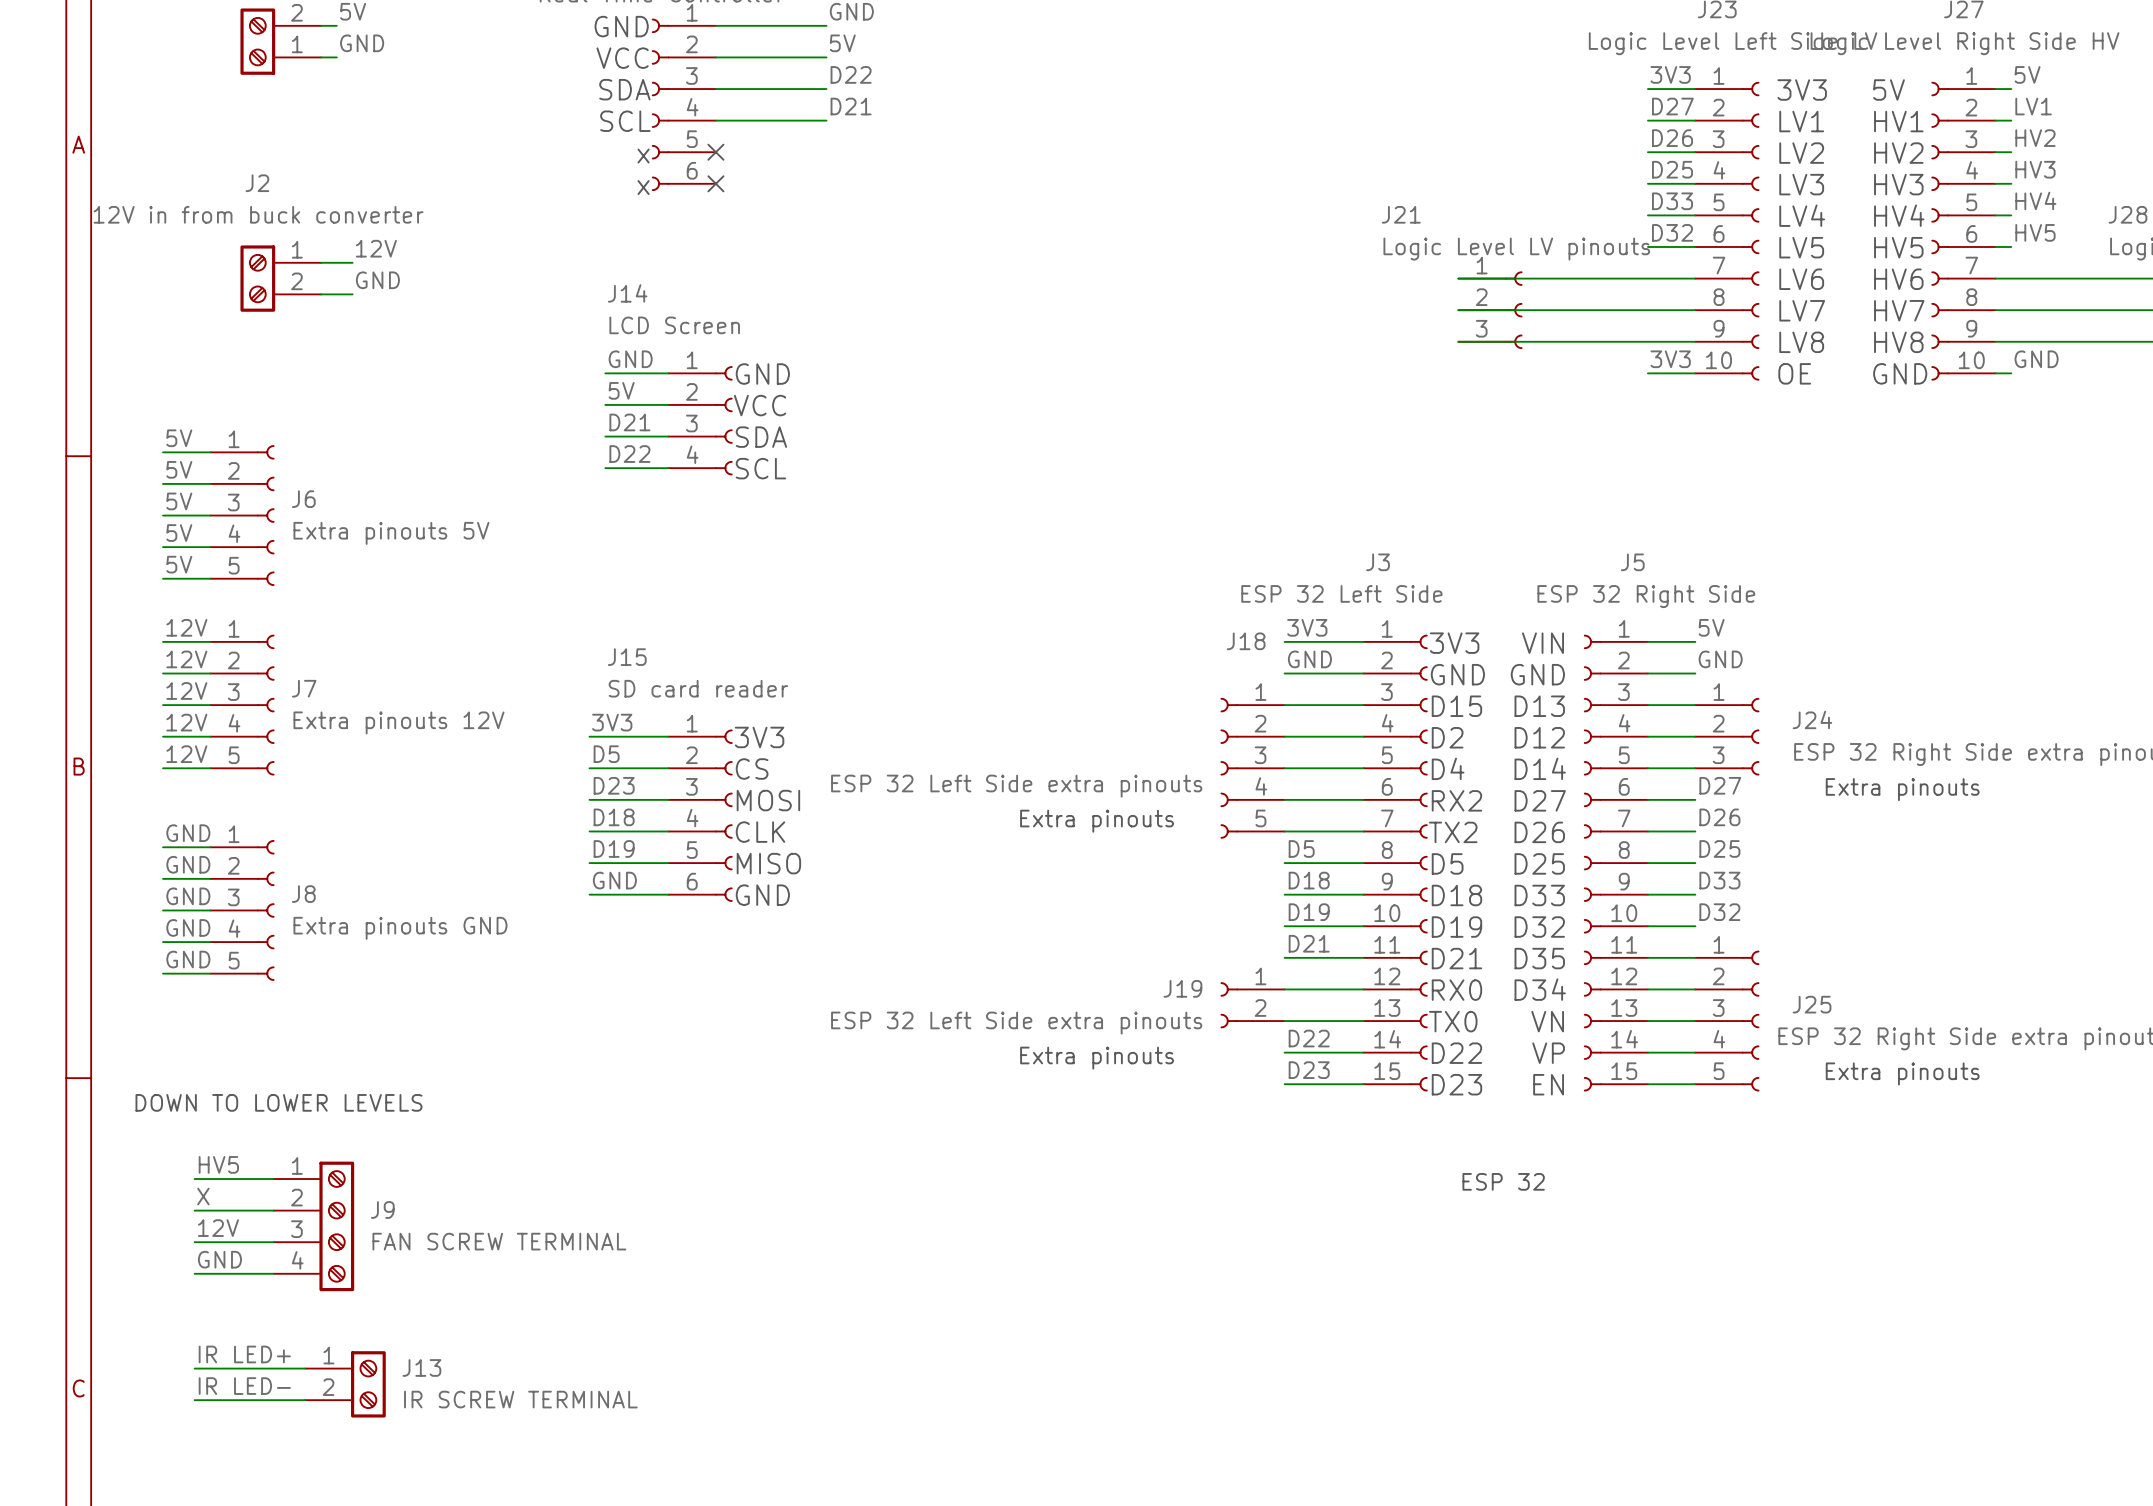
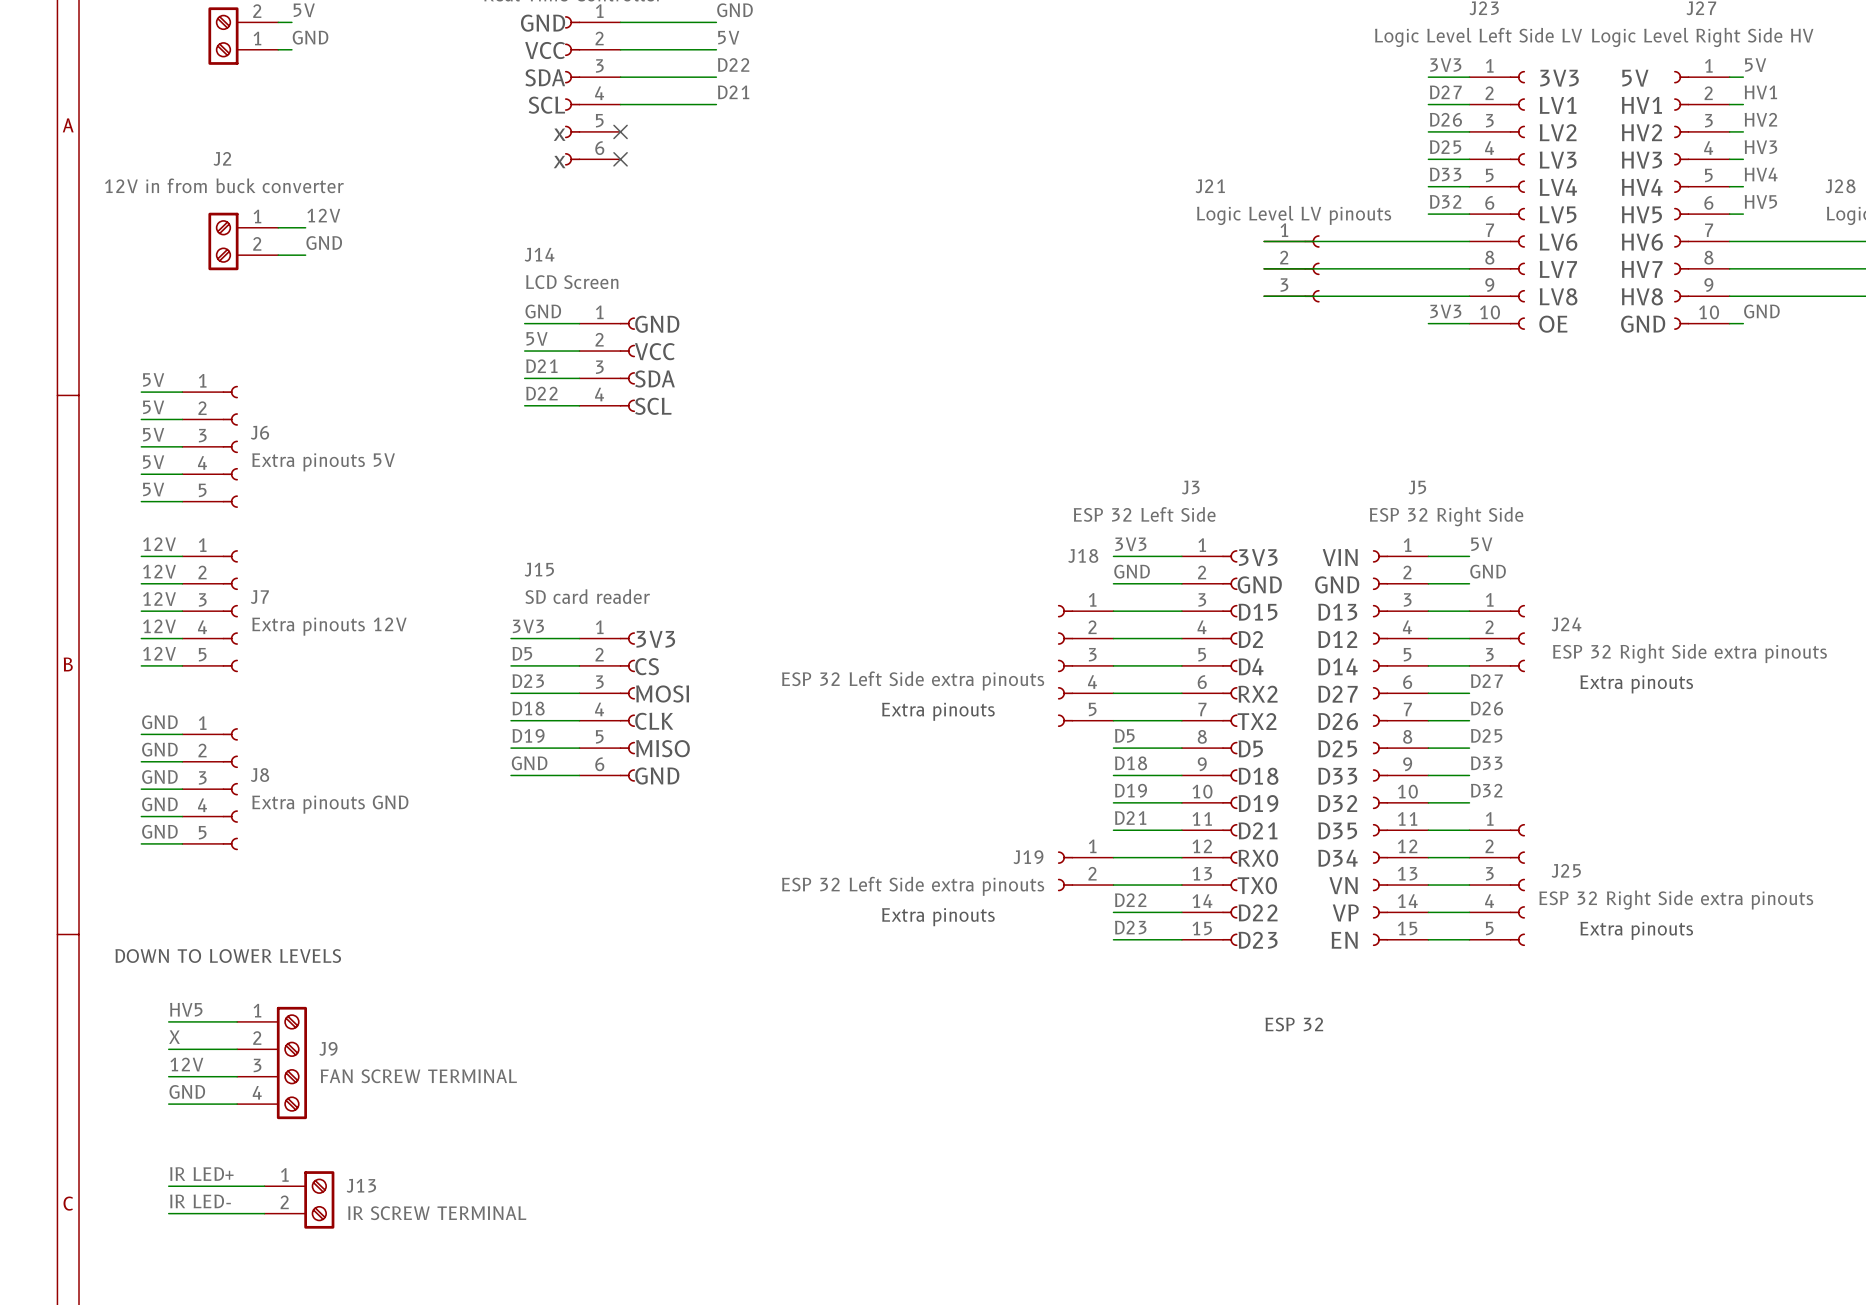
label: LV1 (2033, 106) -> HV1 (1760, 92)

